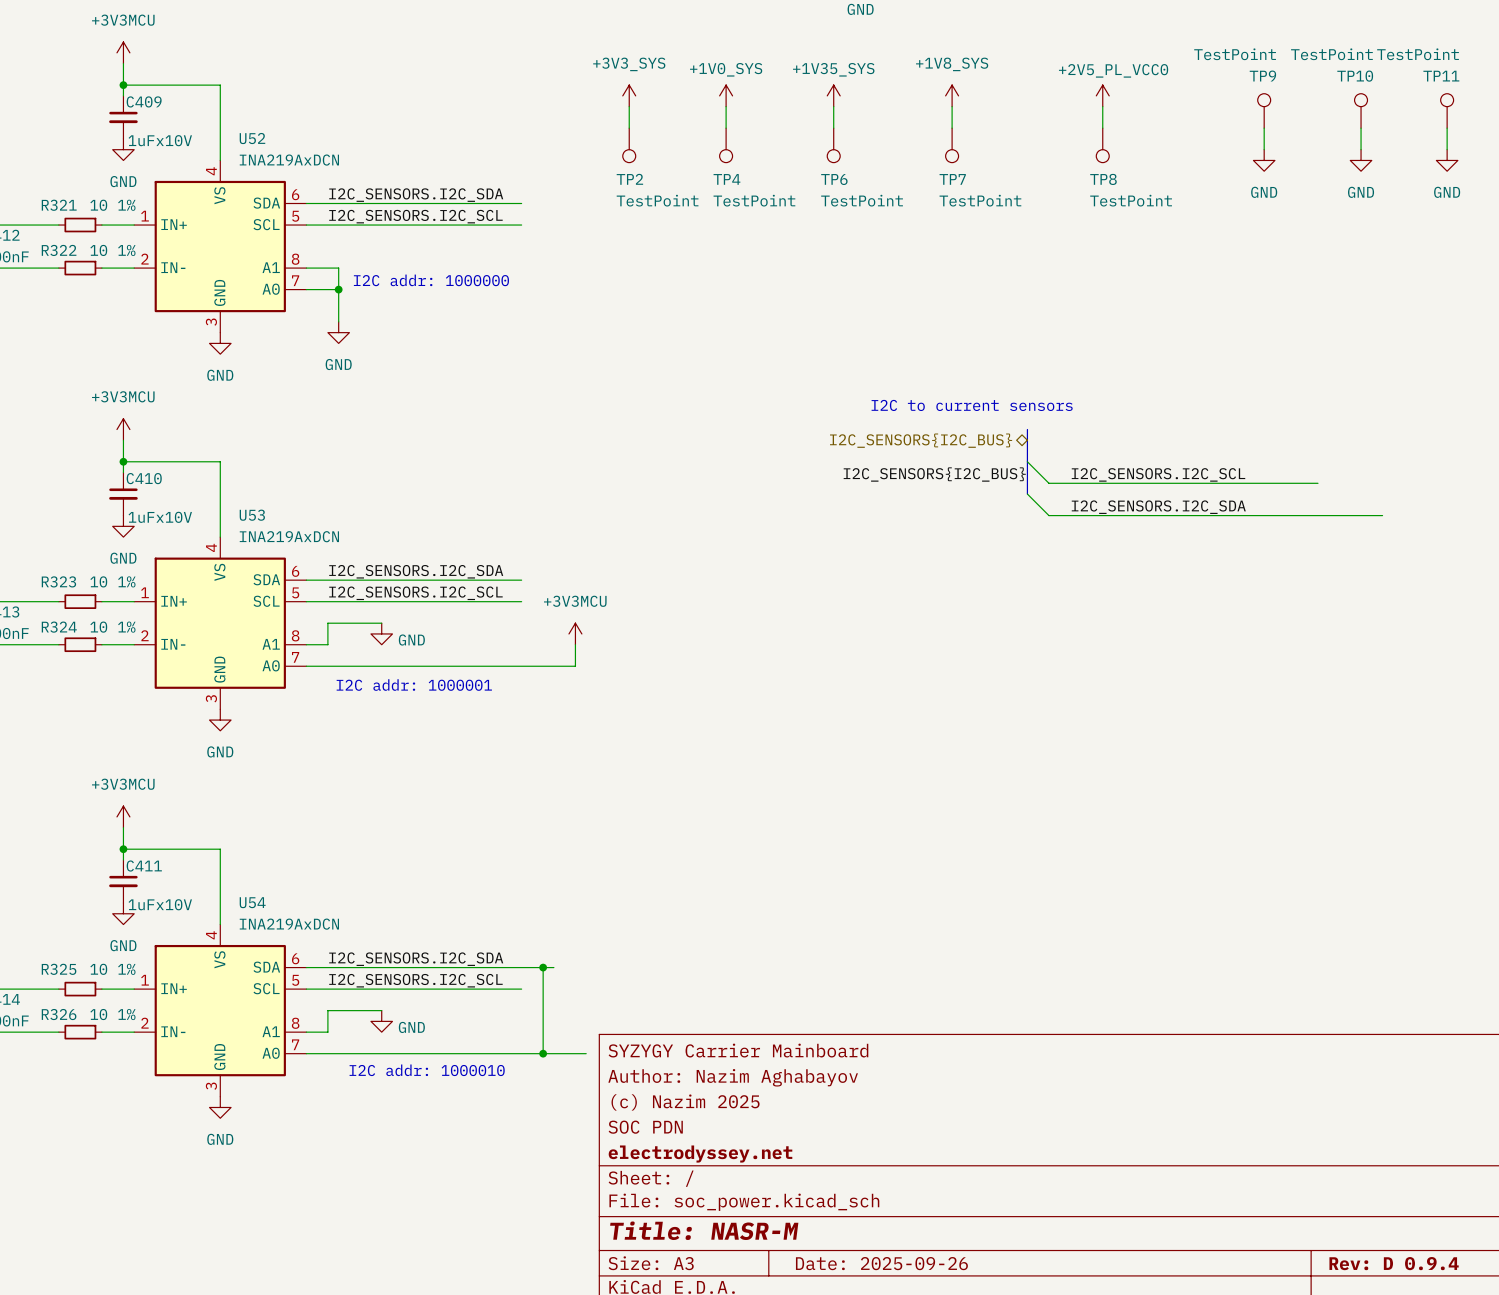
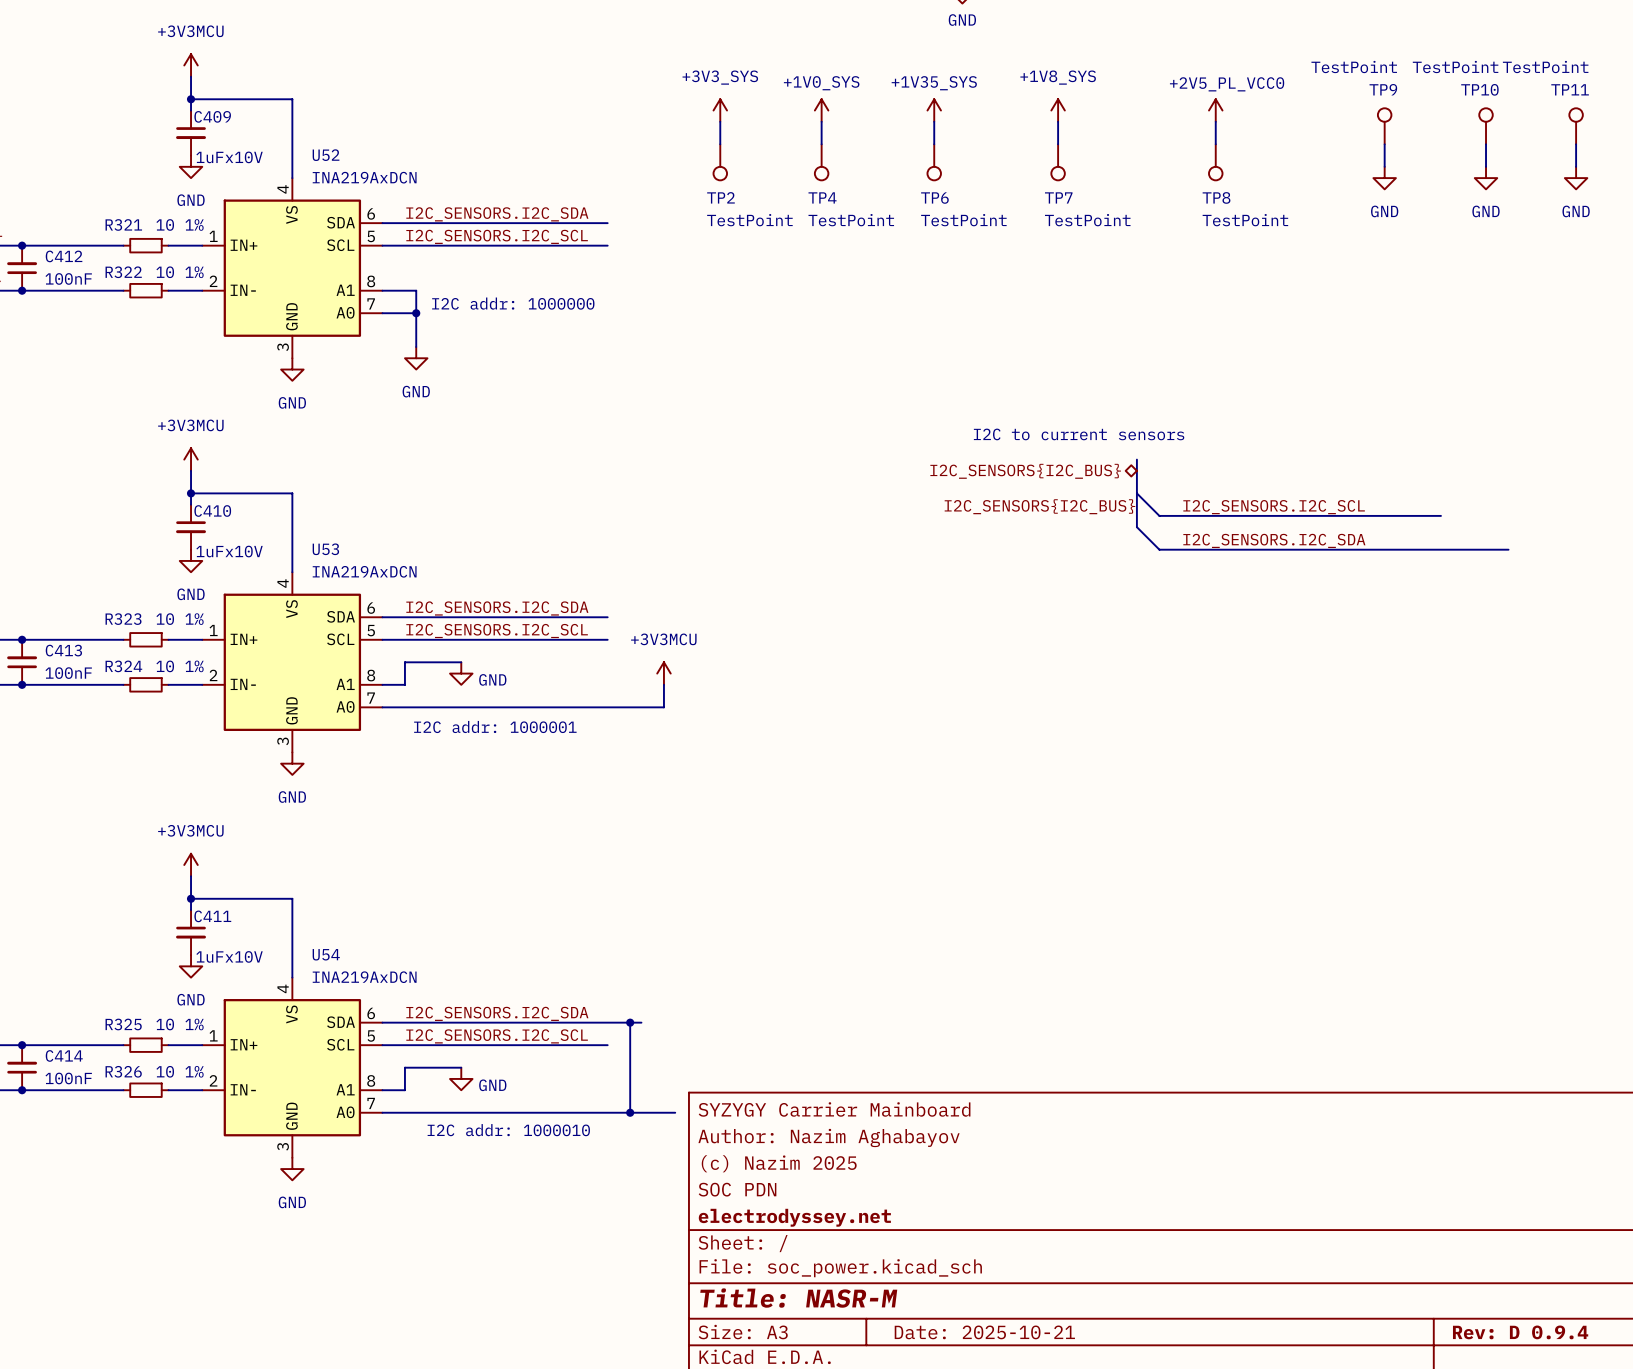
title block: Date: 2025-09-26 (881, 1263) -> Date: 2025-10-21 (984, 1332)

